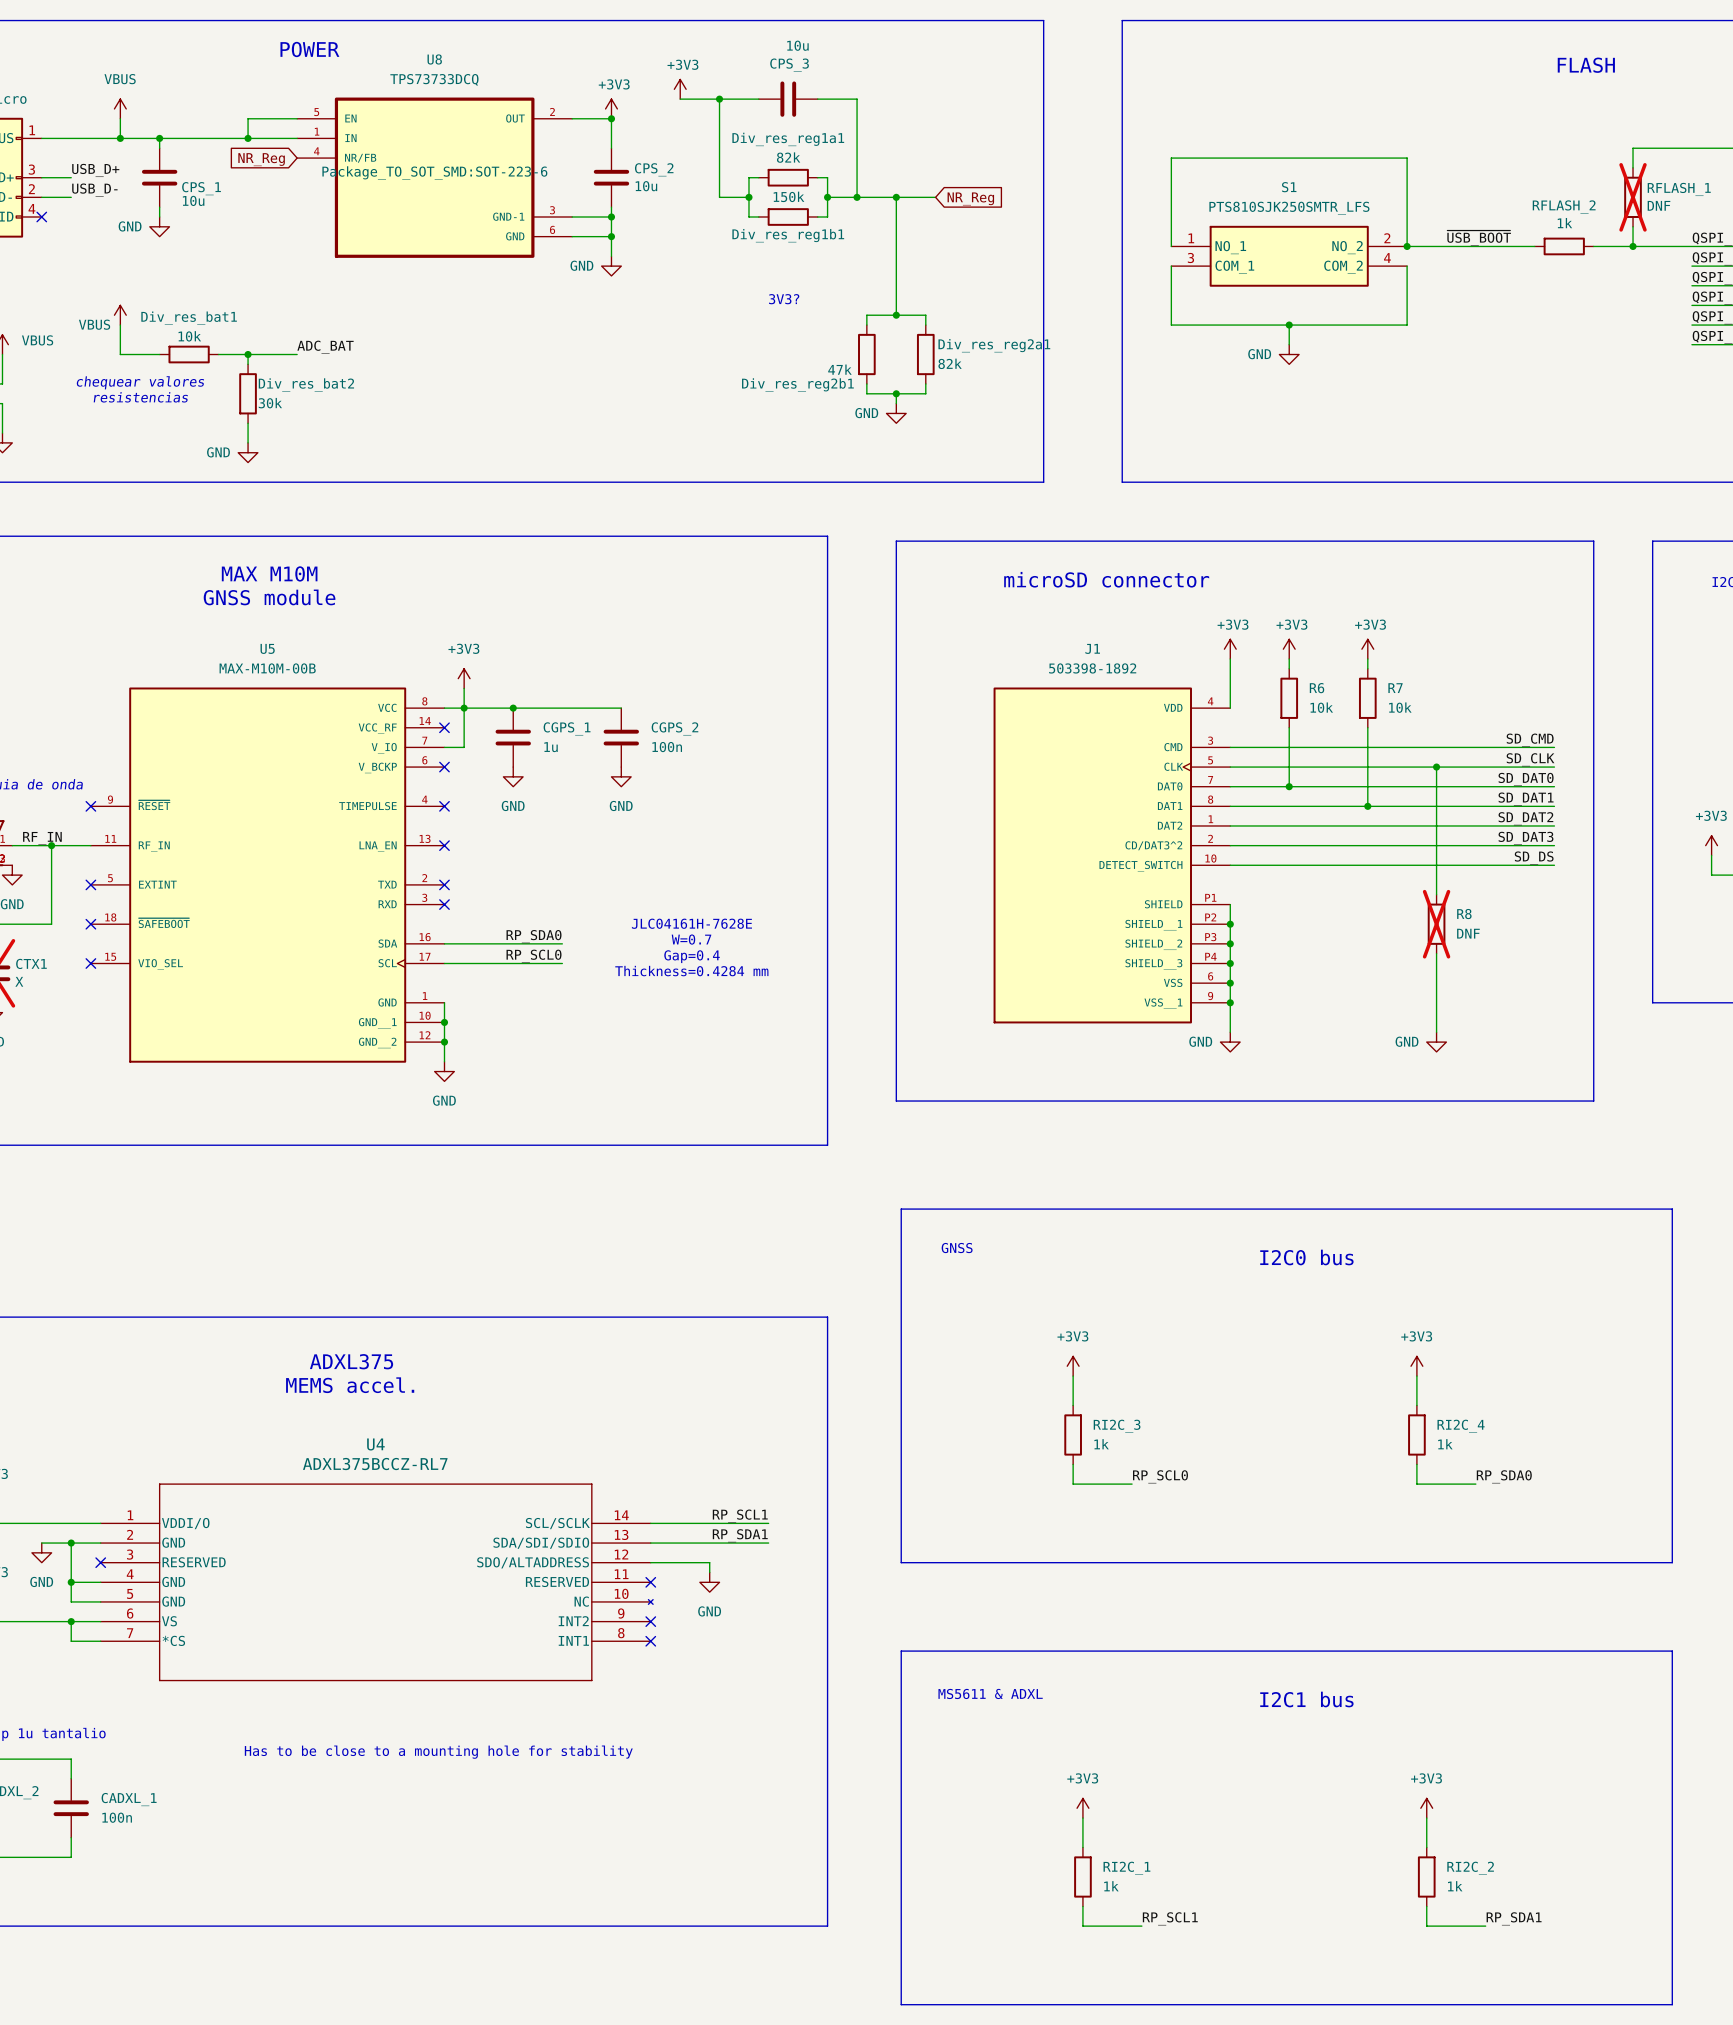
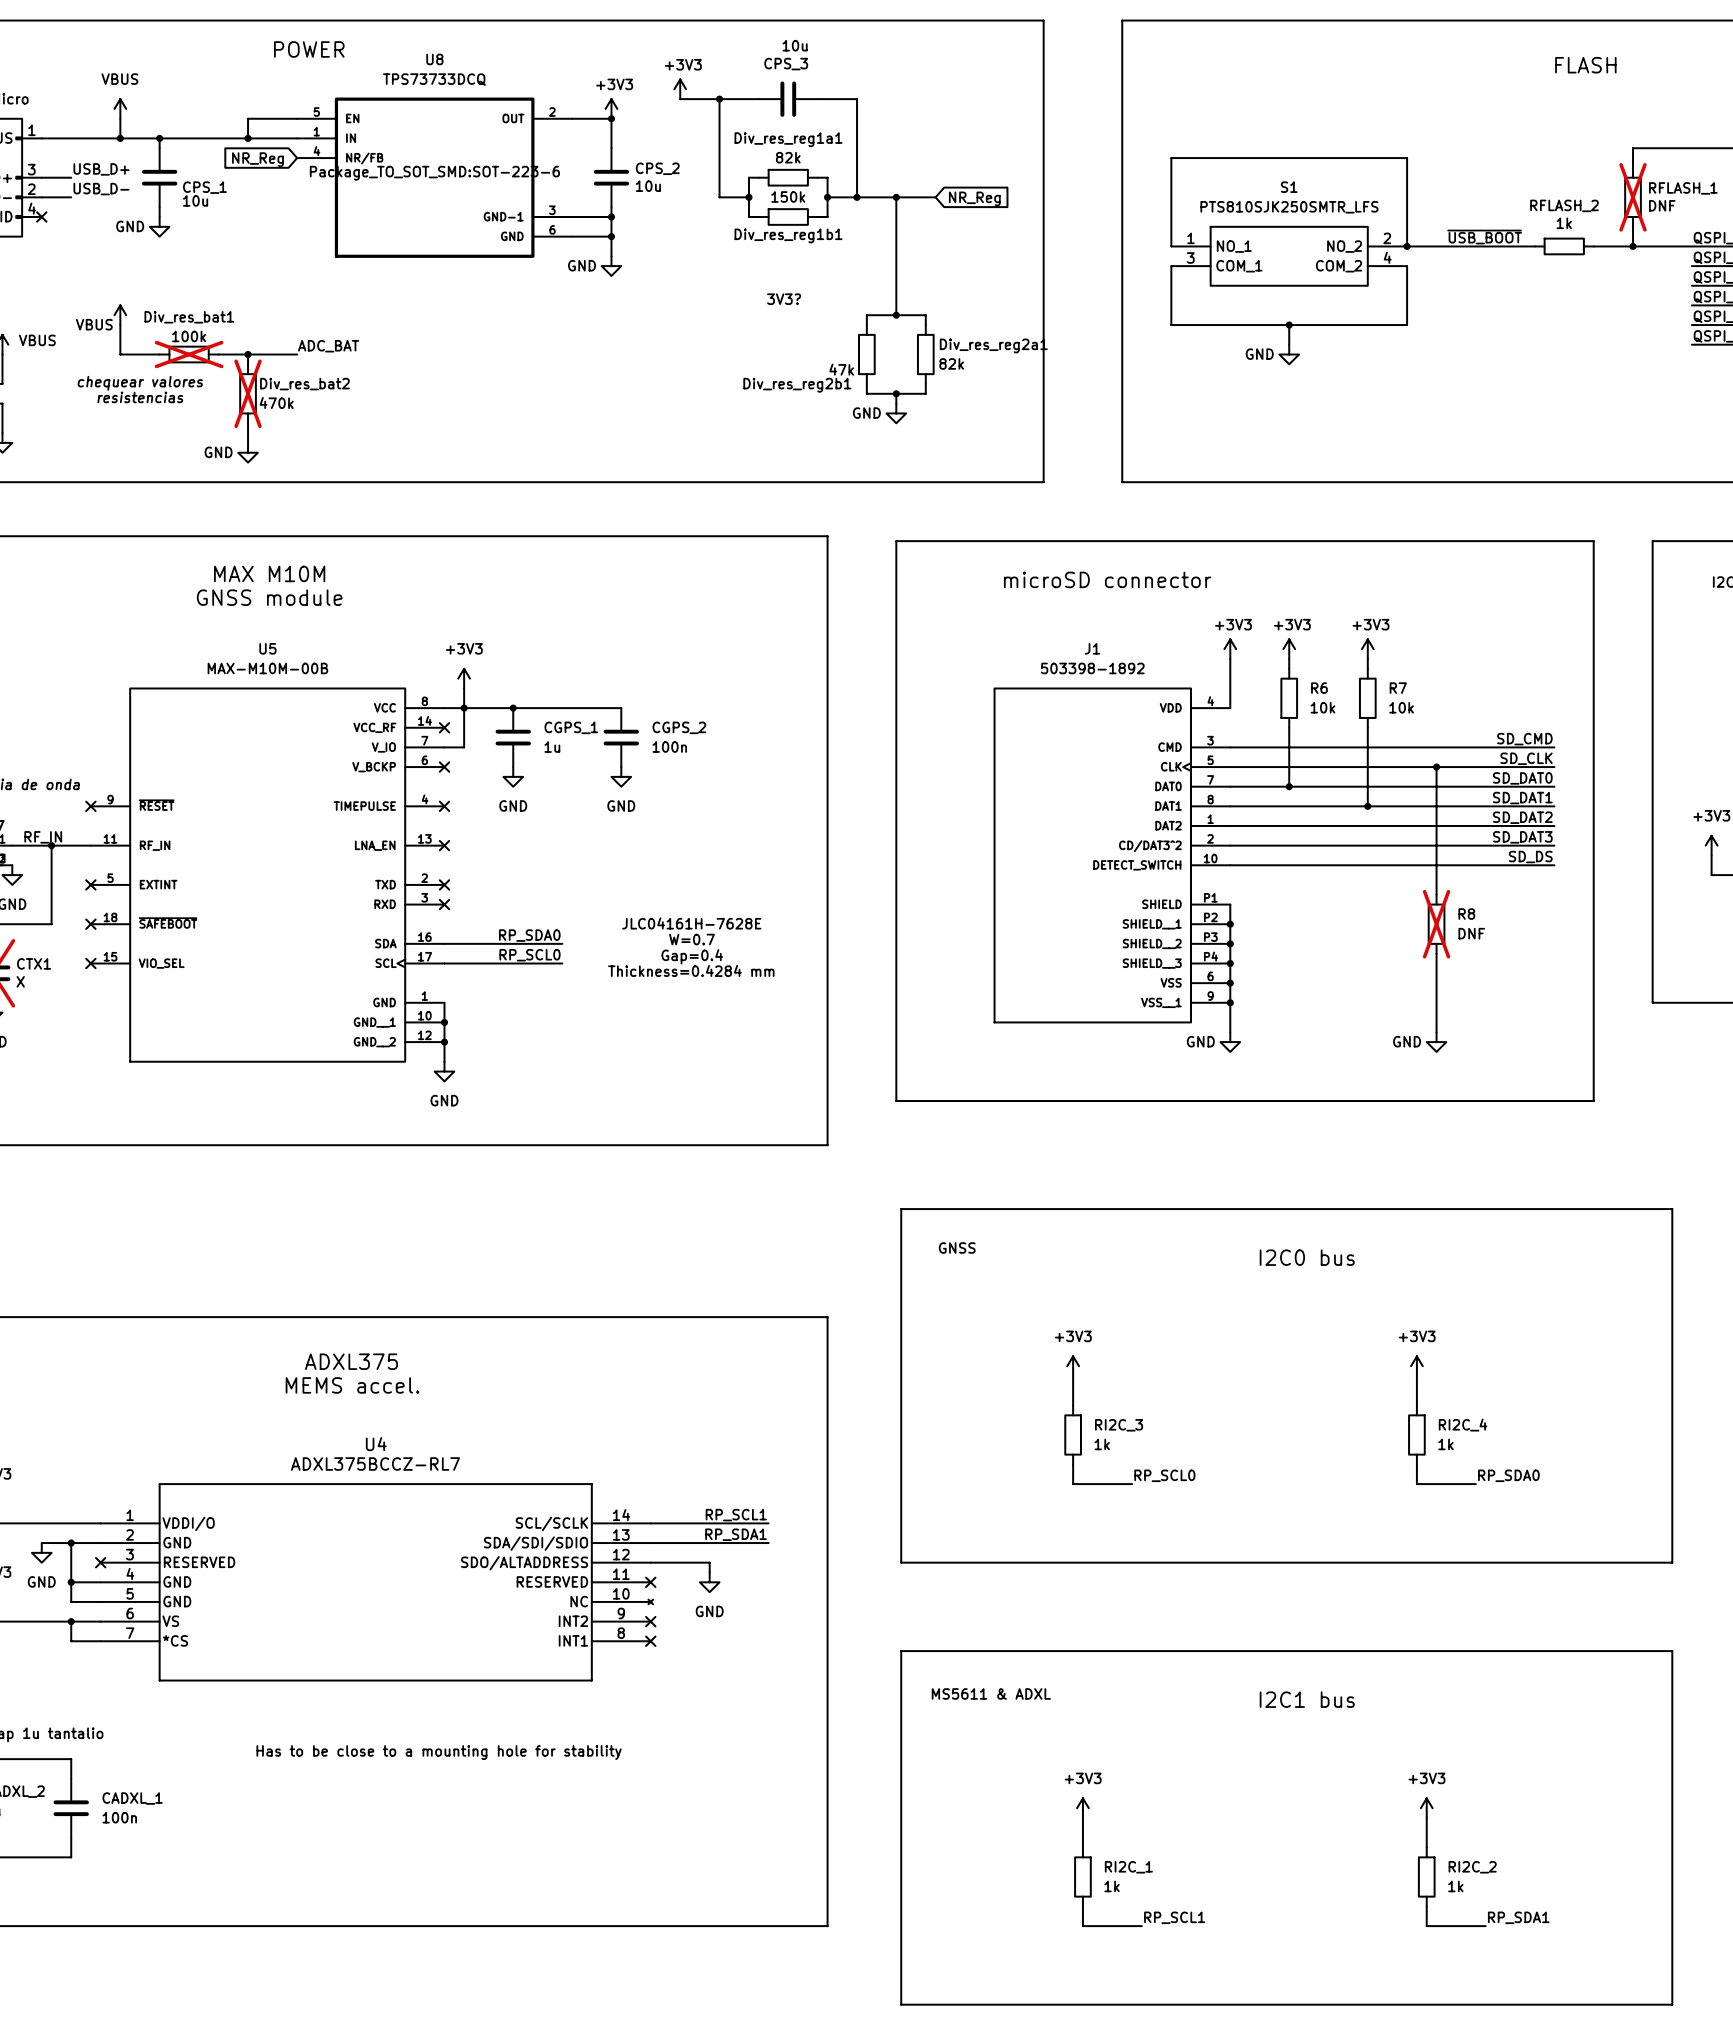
Div_res_bat1 value: 10k (189, 336) -> 100k (189, 336)
Div_res_bat1 do-not-place cross: none -> (189, 354)
Div_res_bat2 do-not-place cross: none -> (248, 393)
Div_res_bat2 value: 30k (270, 403) -> 470k (276, 403)

